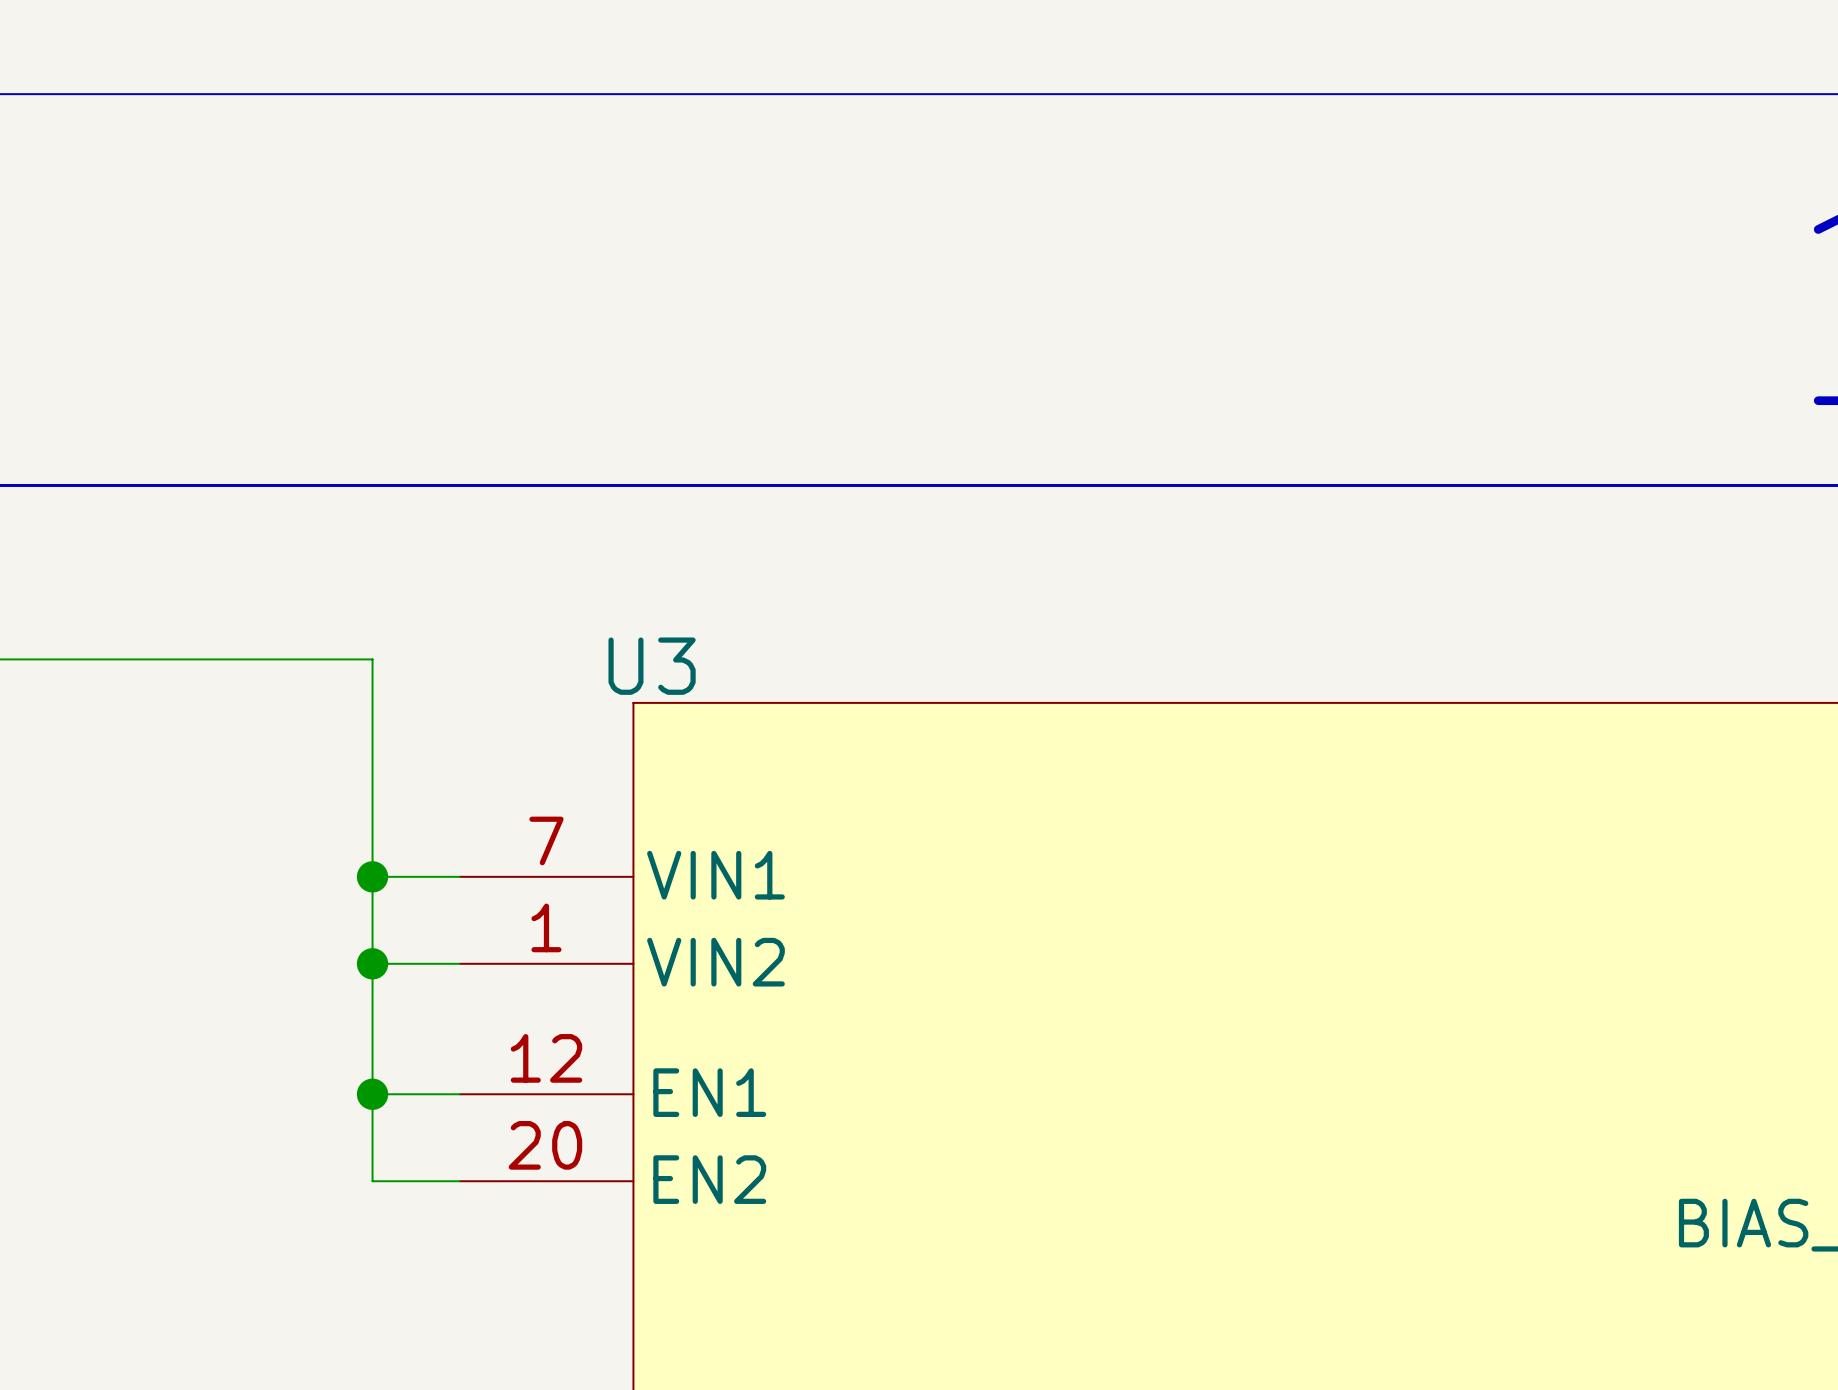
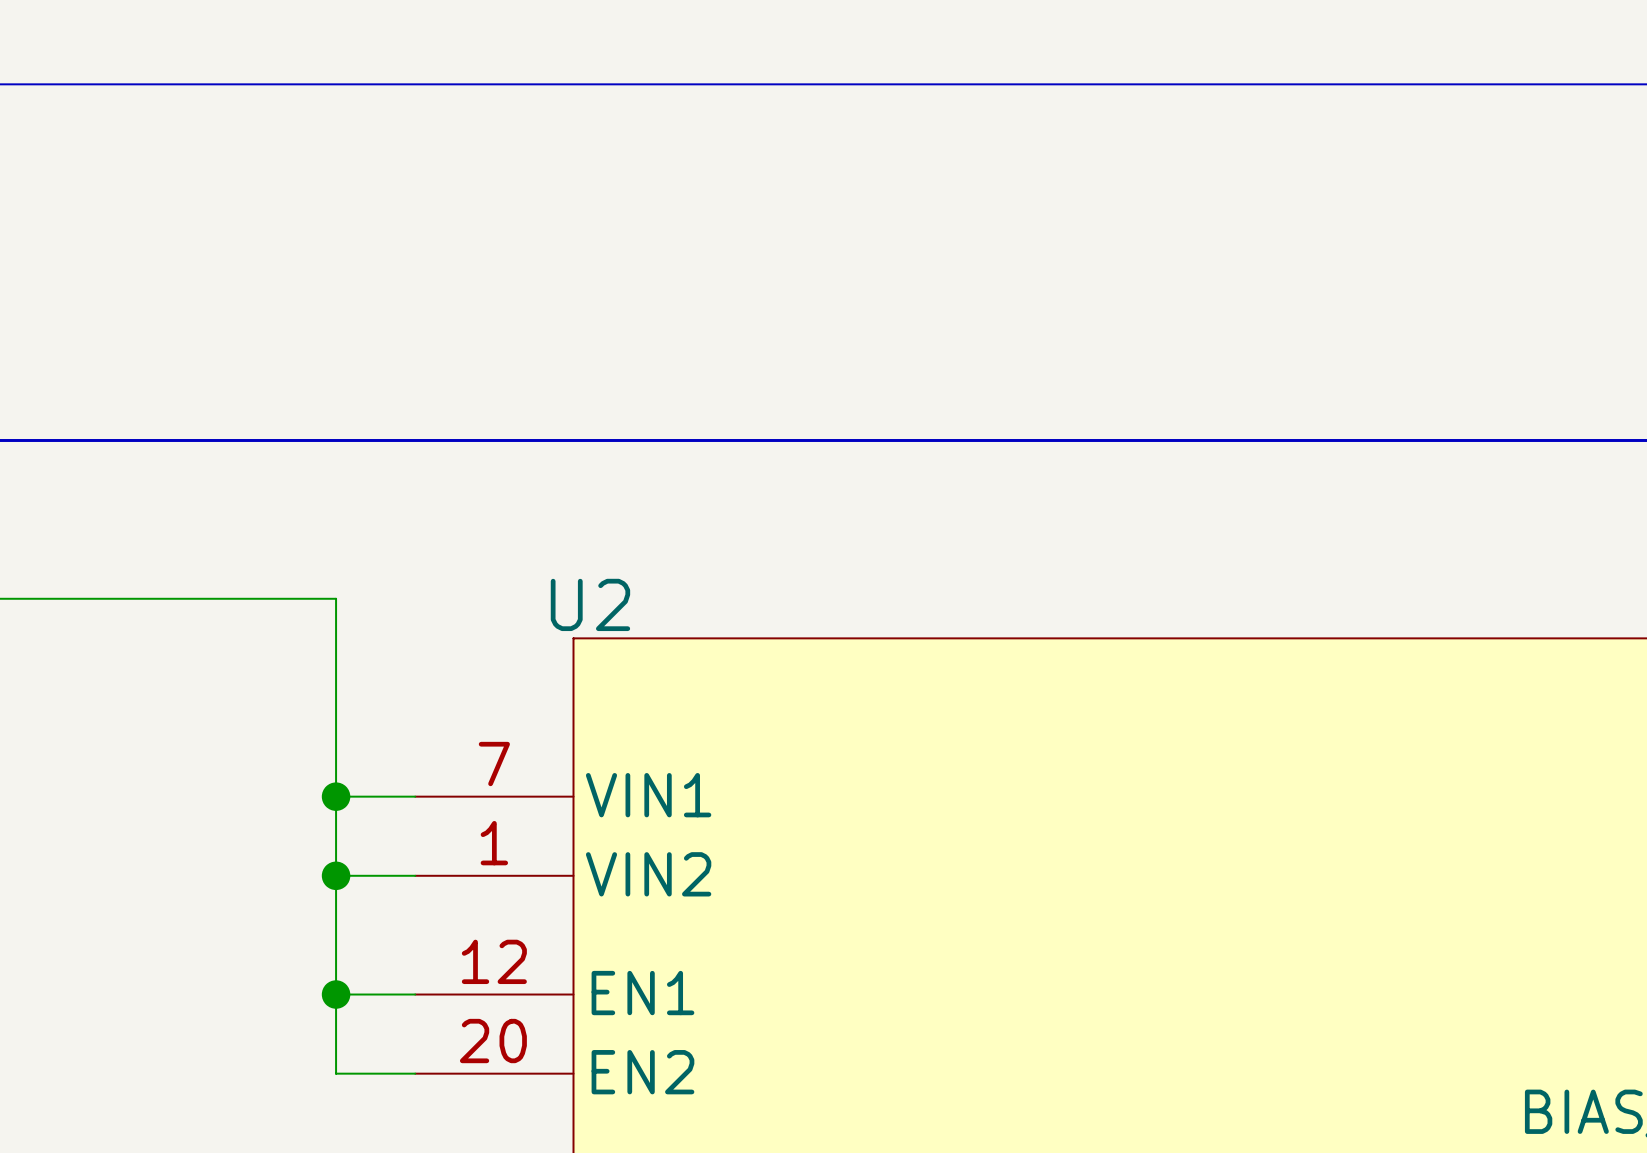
U3 name: U3 (652, 666) -> U2 (590, 604)

